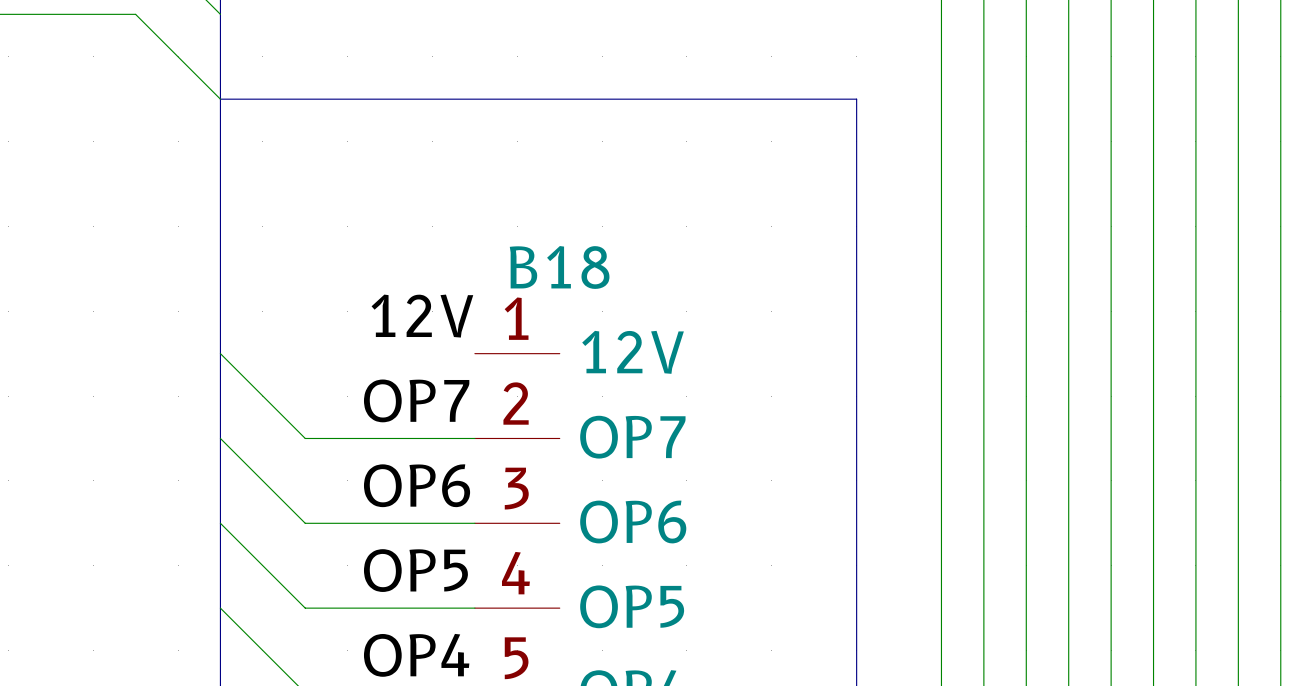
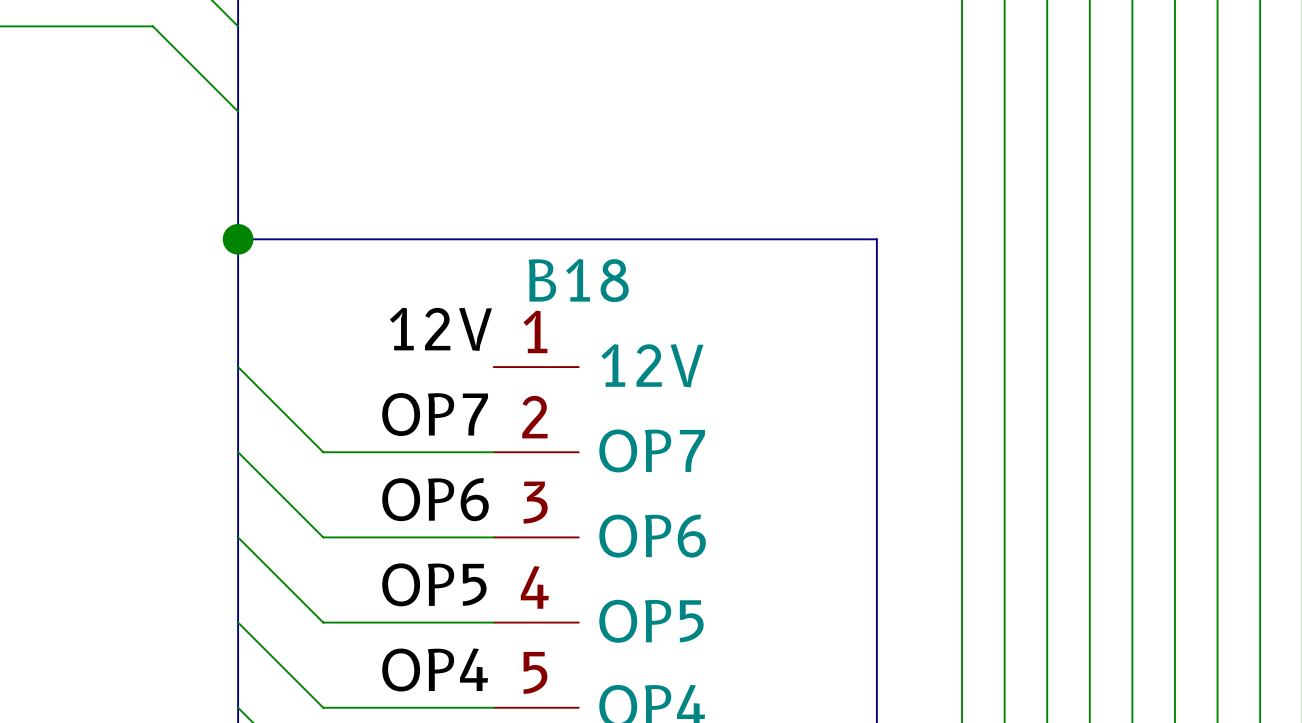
bus: (220, 99) (856, 99) (856, 226) -> (238, 239) (876, 239)
junction: none -> (238, 239)

